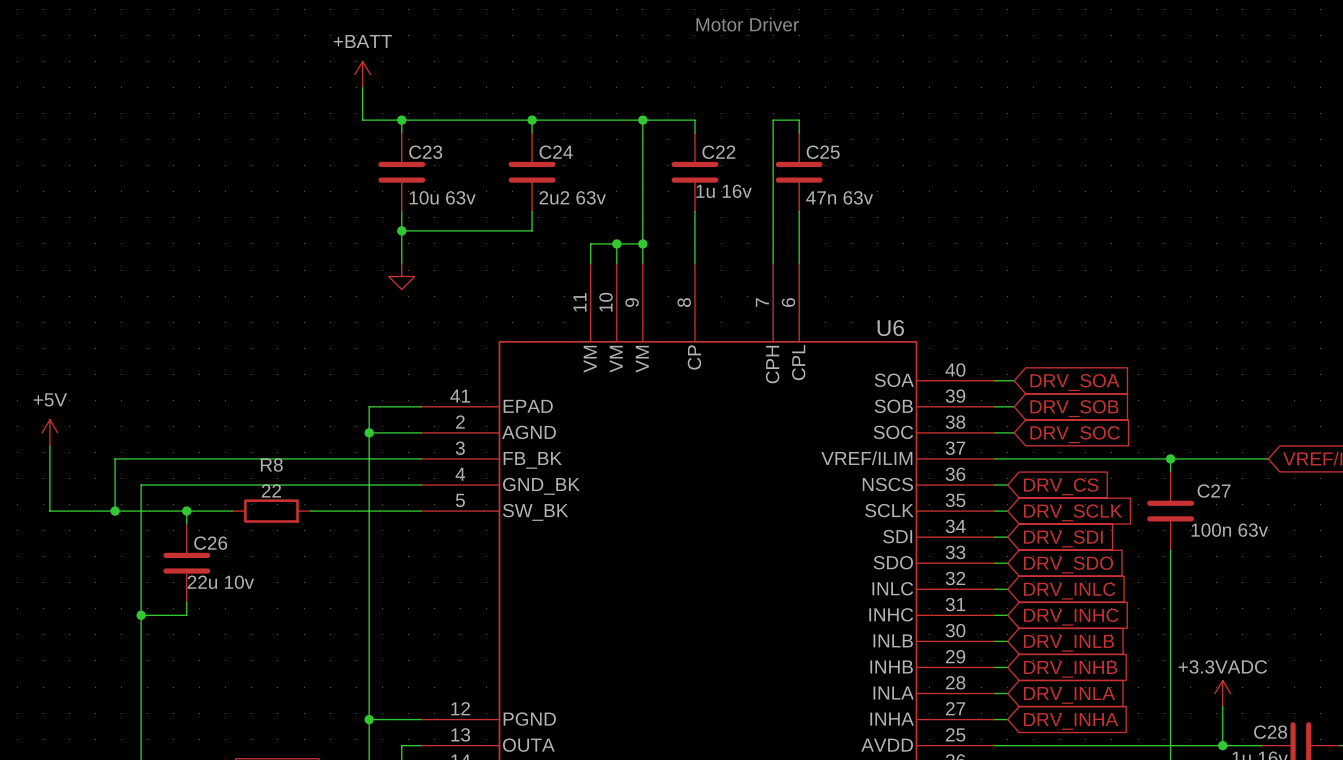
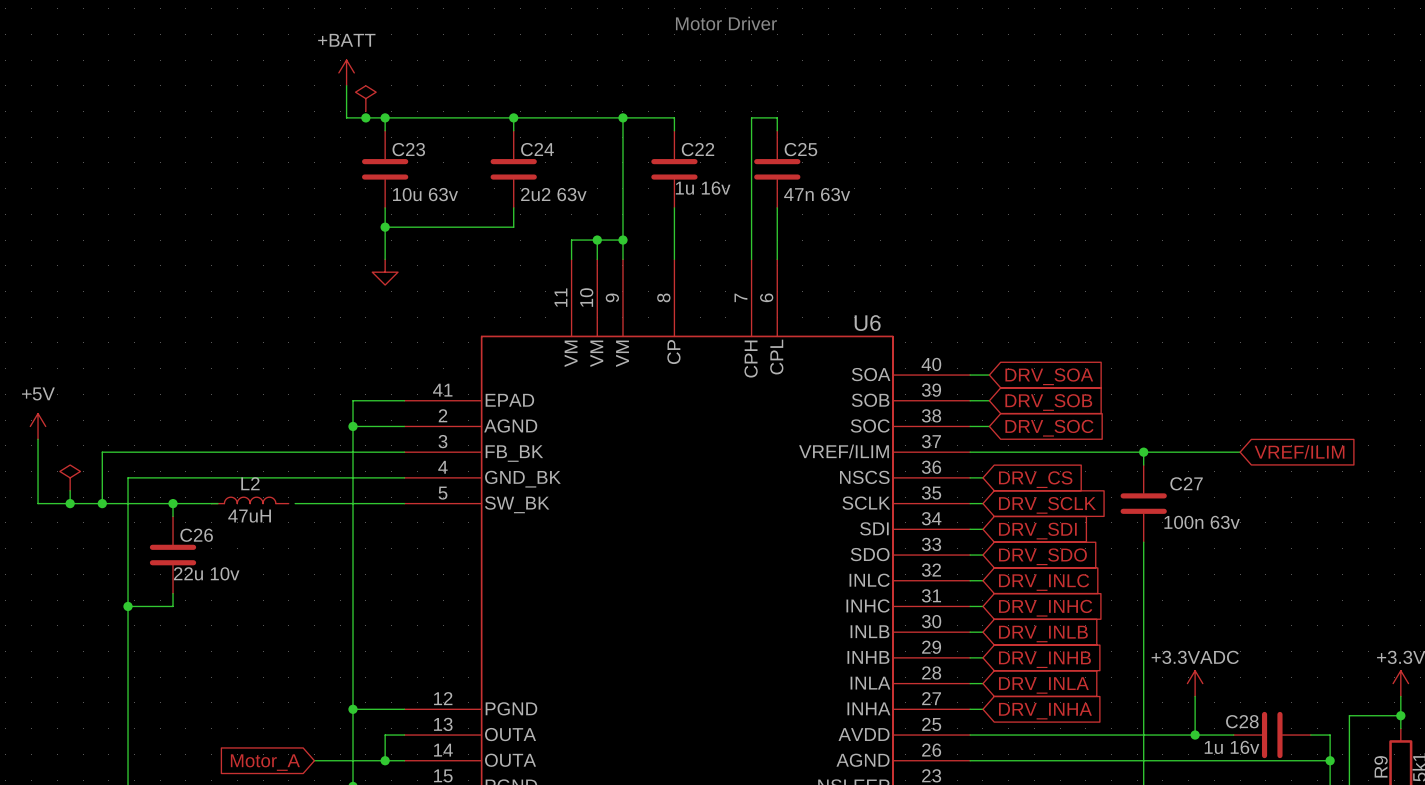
power symbol: none -> (365, 98)
junction: none -> (365, 117)
power symbol: none -> (70, 477)
wire: none -> (70, 490) (70, 503)
L2: none -> 47uH (250, 500)
junction: none -> (70, 503)
R8: 22 (271, 511) -> none

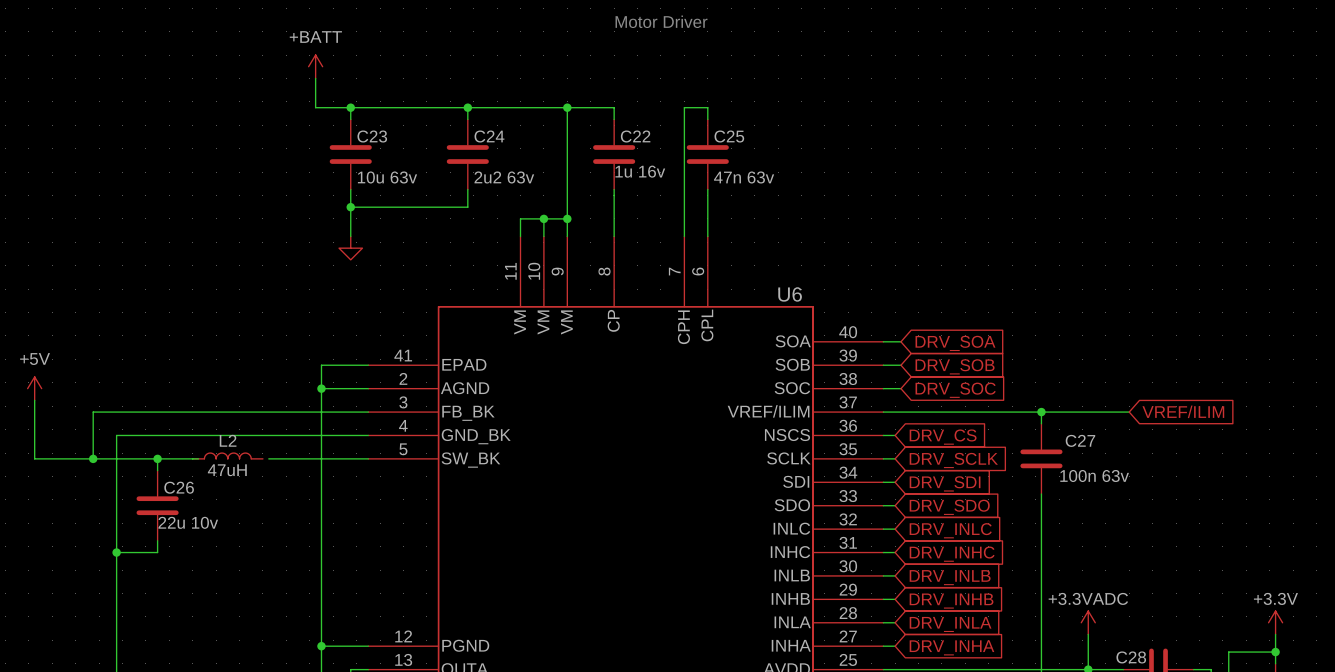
power symbol: (365, 98) -> none
junction: (365, 117) -> none
power symbol: (70, 477) -> none
wire: (70, 490) (70, 503) -> none
junction: (70, 503) -> none

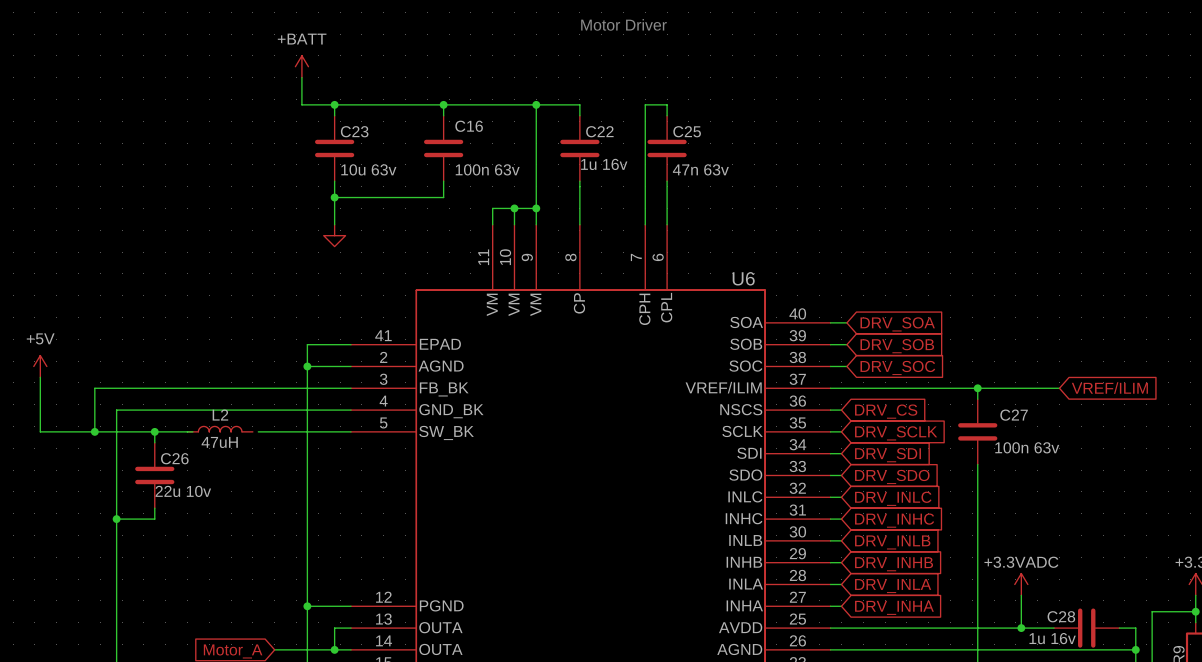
C24 name: C24 (489, 136) -> C16 (469, 126)
C24 value: 2u2 63v (504, 177) -> 100n 63v (487, 169)

